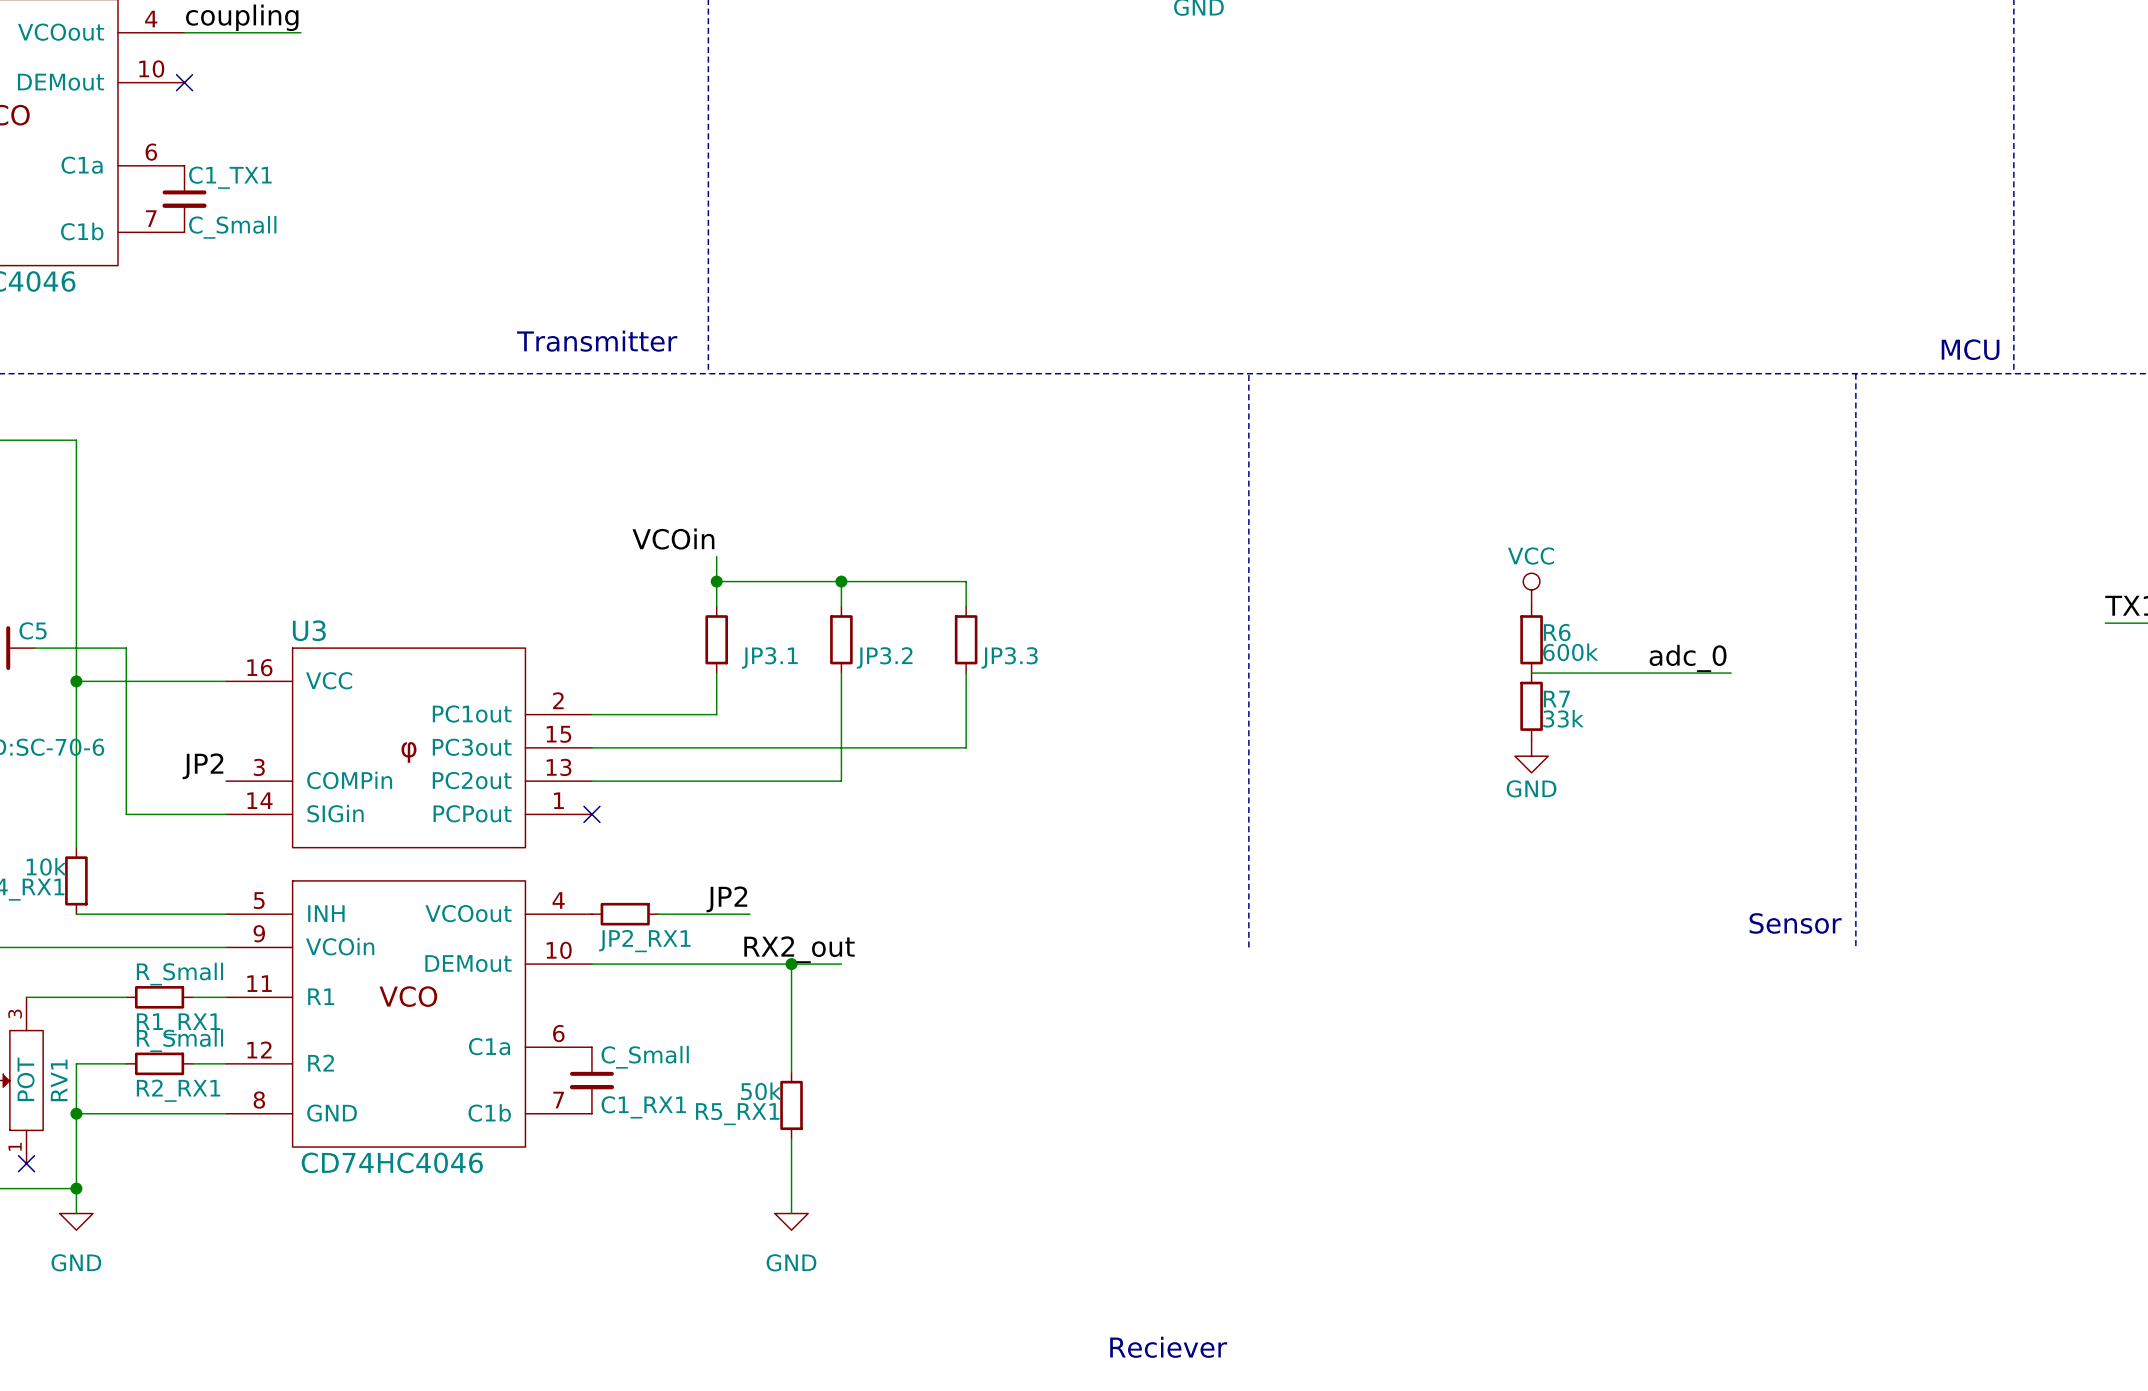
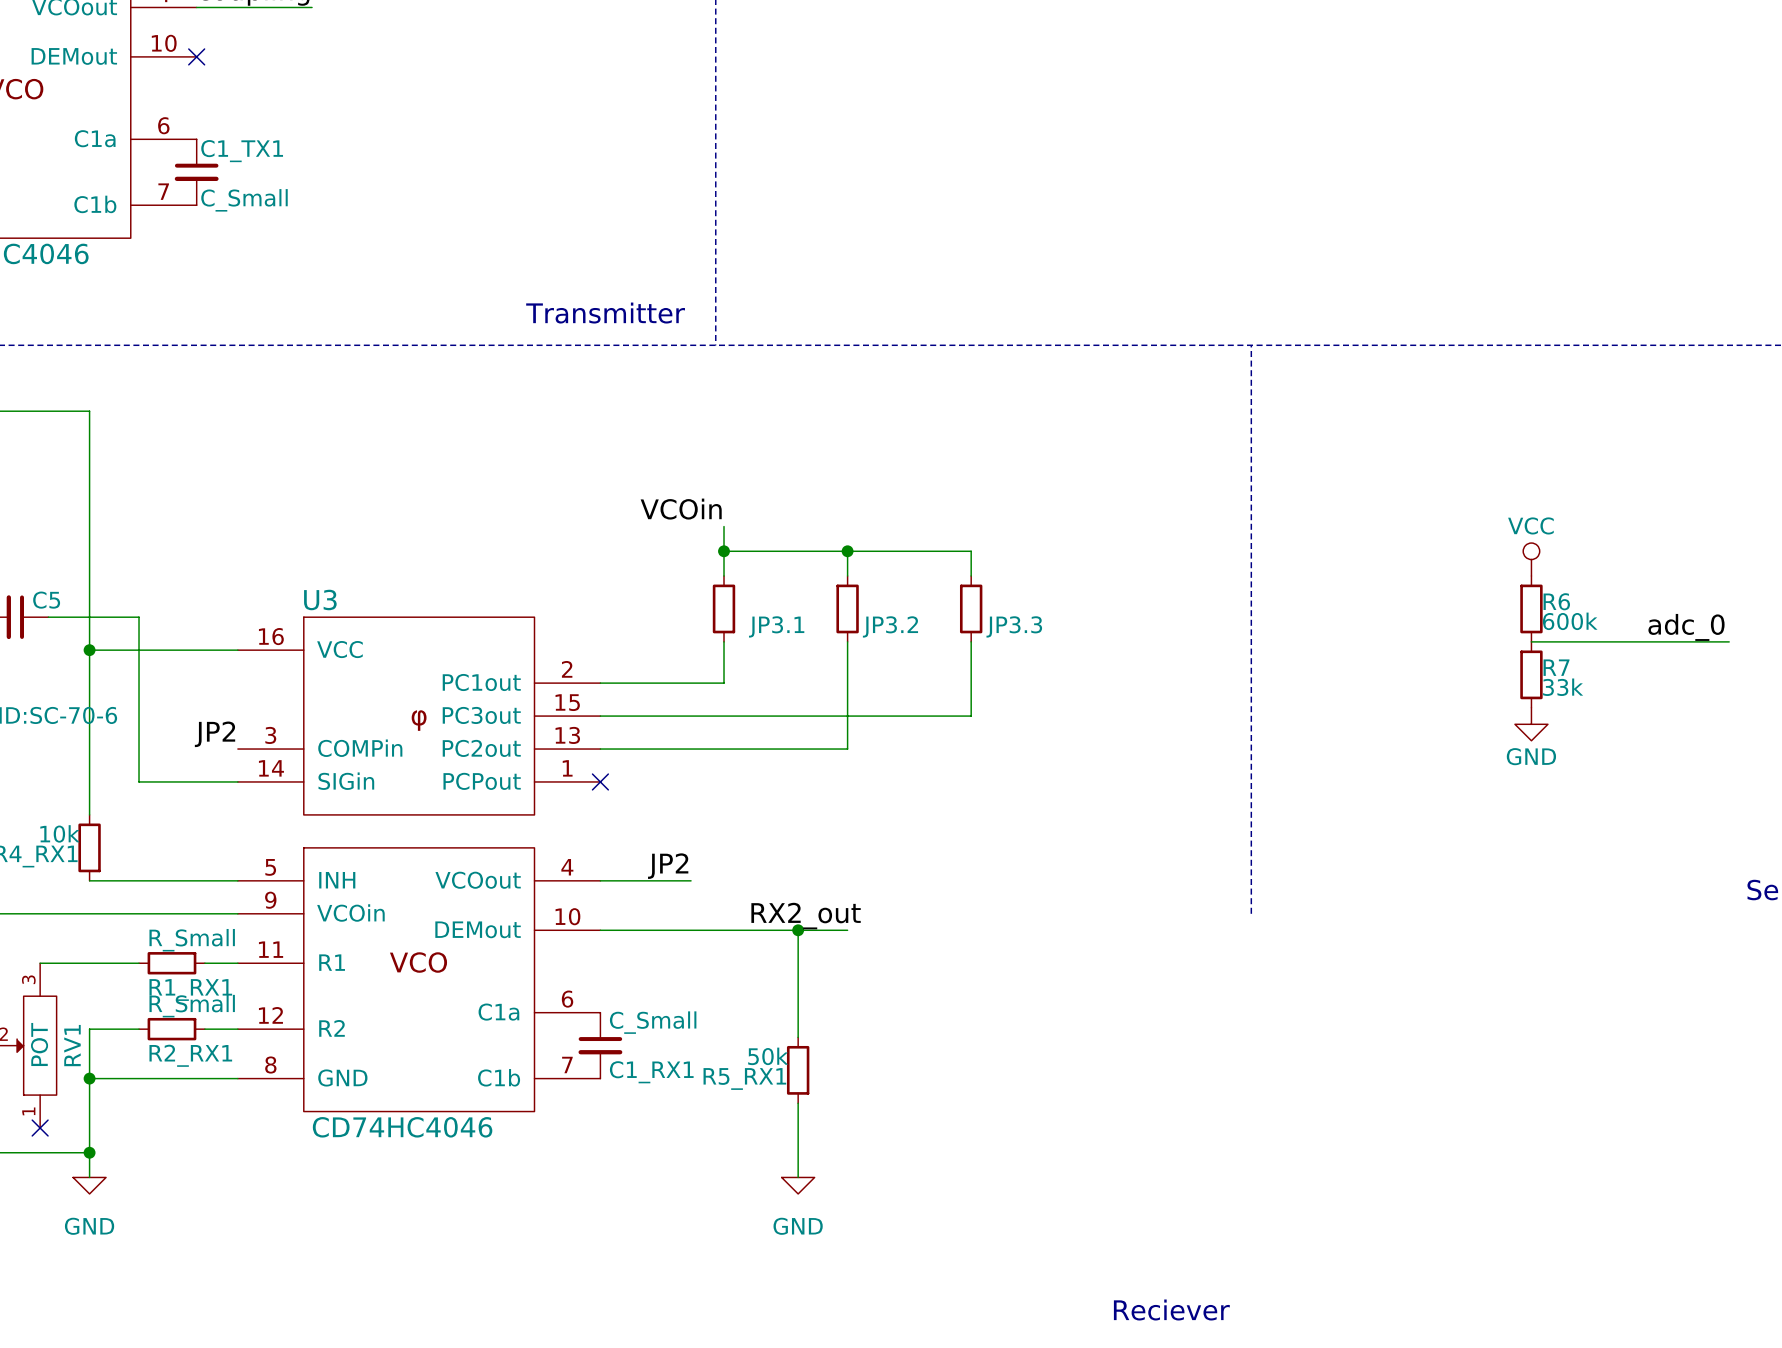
label position: JP2 (726, 899) -> JP2 (668, 866)
JP2_RX1: (625, 914) -> none
wire: (683, 914) (749, 914) -> (600, 880) (666, 880)

